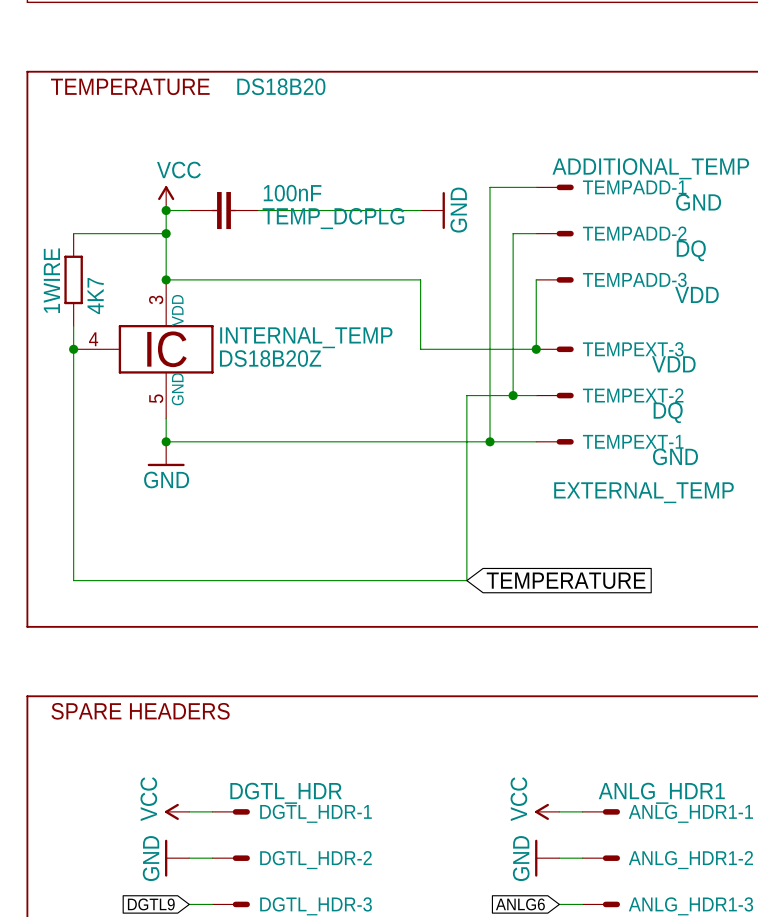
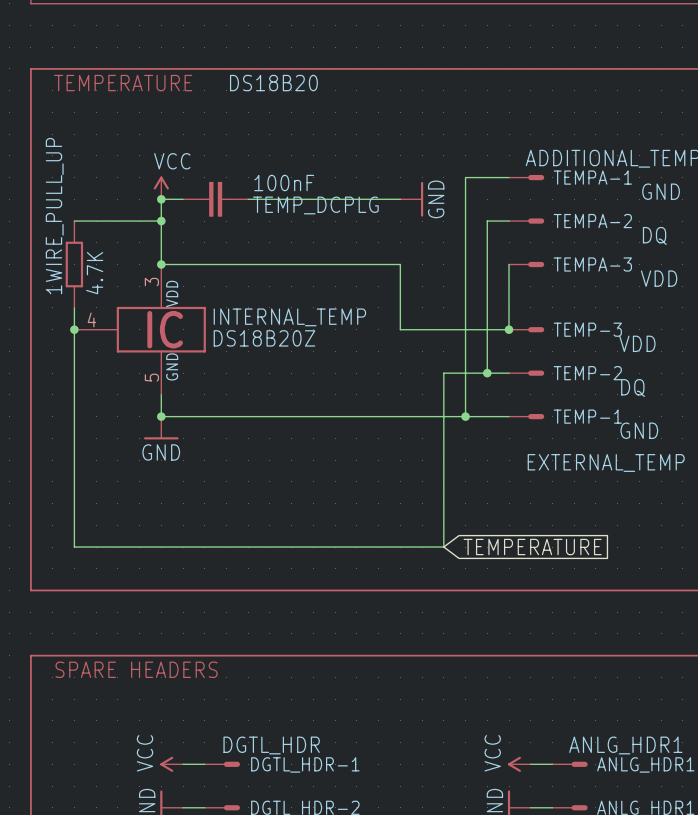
TEMPADD-1 name: TEMPADD-1 (634, 187) -> TEMPA-1 (592, 177)
TEMPADD-2 name: TEMPADD-2 (634, 233) -> TEMPA-2 (592, 221)
TEMPADD-3 name: TEMPADD-3 (634, 279) -> TEMPA-3 (592, 264)
1WIRE name: 1WIRE (51, 280) -> 1WIRE_PULL_UP (54, 216)
1WIRE value: 4K7 (95, 296) -> 4.7K (94, 273)
TEMPEXT-3 name: TEMPEXT-3 (633, 349) -> TEMP-3 (587, 329)
TEMPEXT-2 name: TEMPEXT-2 (633, 395) -> TEMP-2 (587, 373)
TEMPEXT-1 name: TEMPEXT-1 (633, 441) -> TEMP-1 (587, 416)

